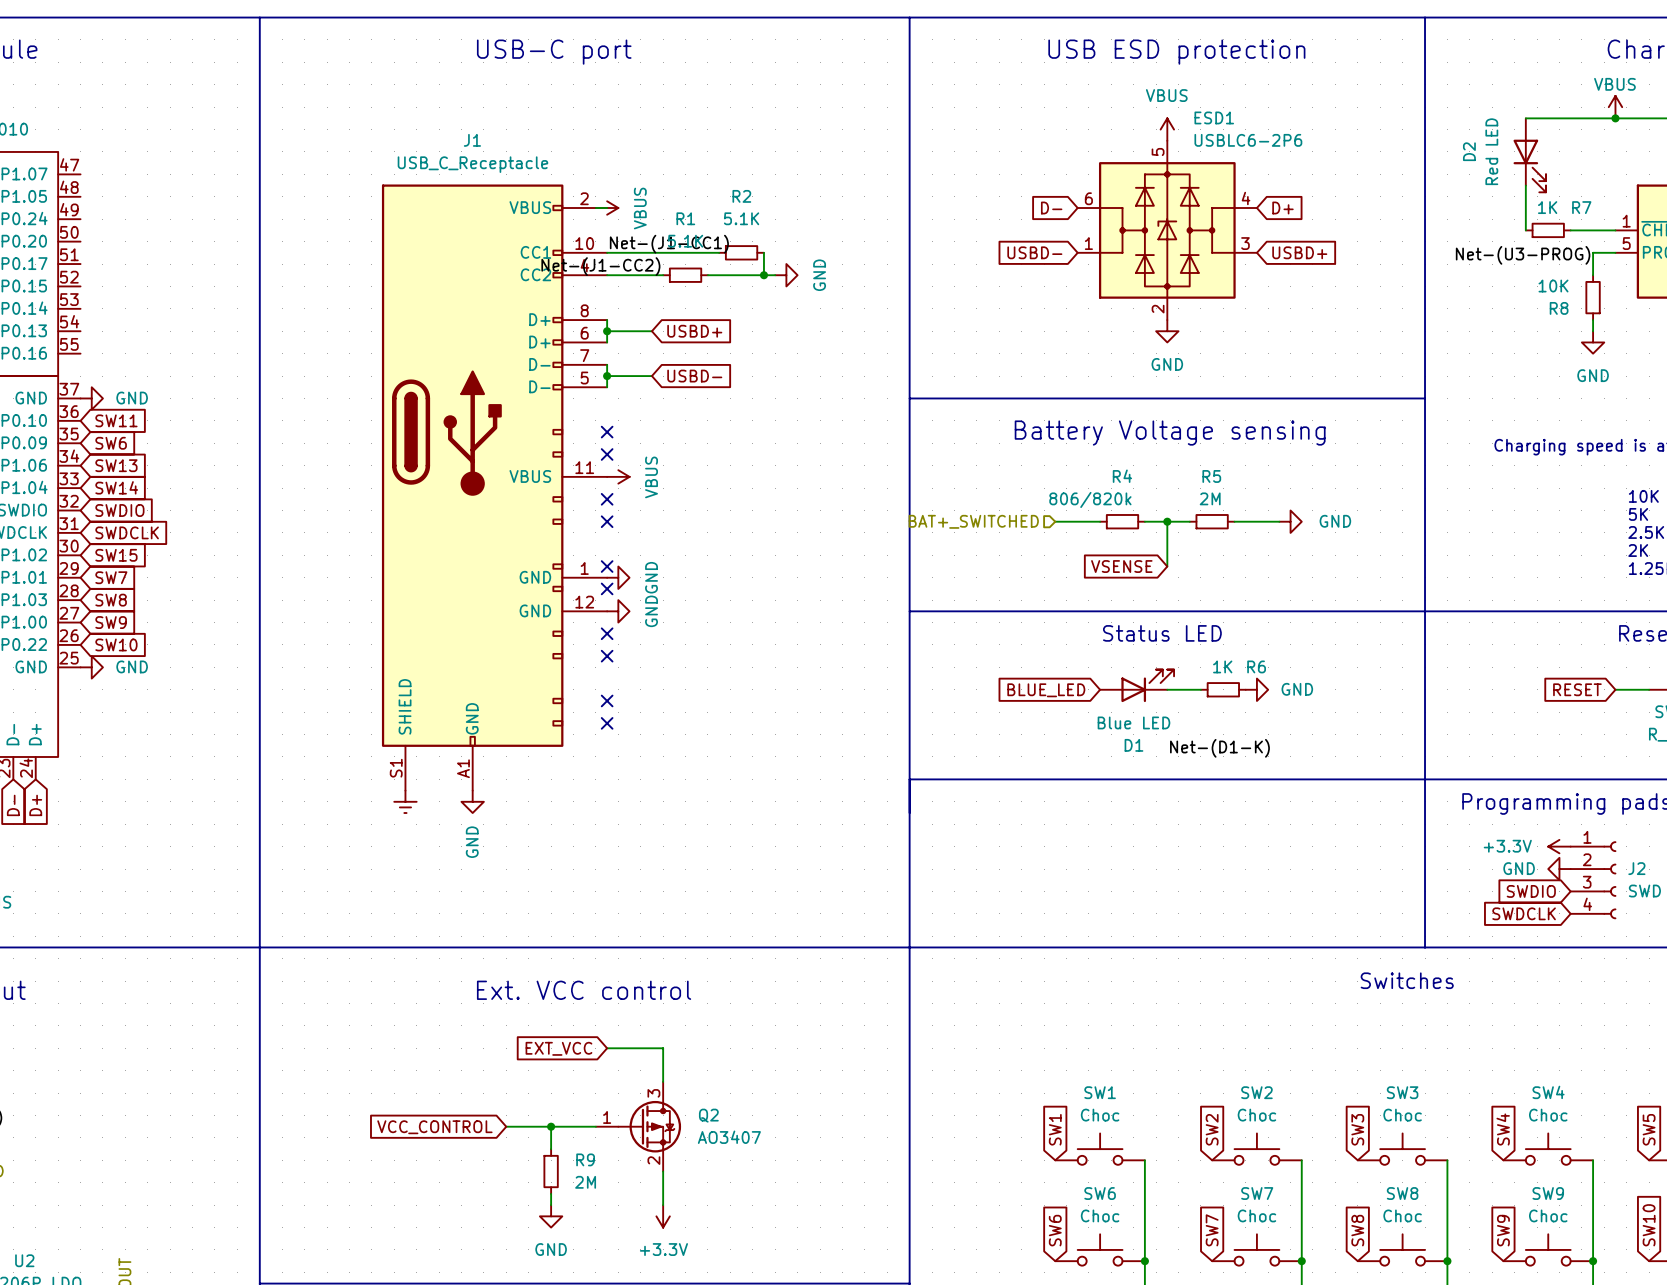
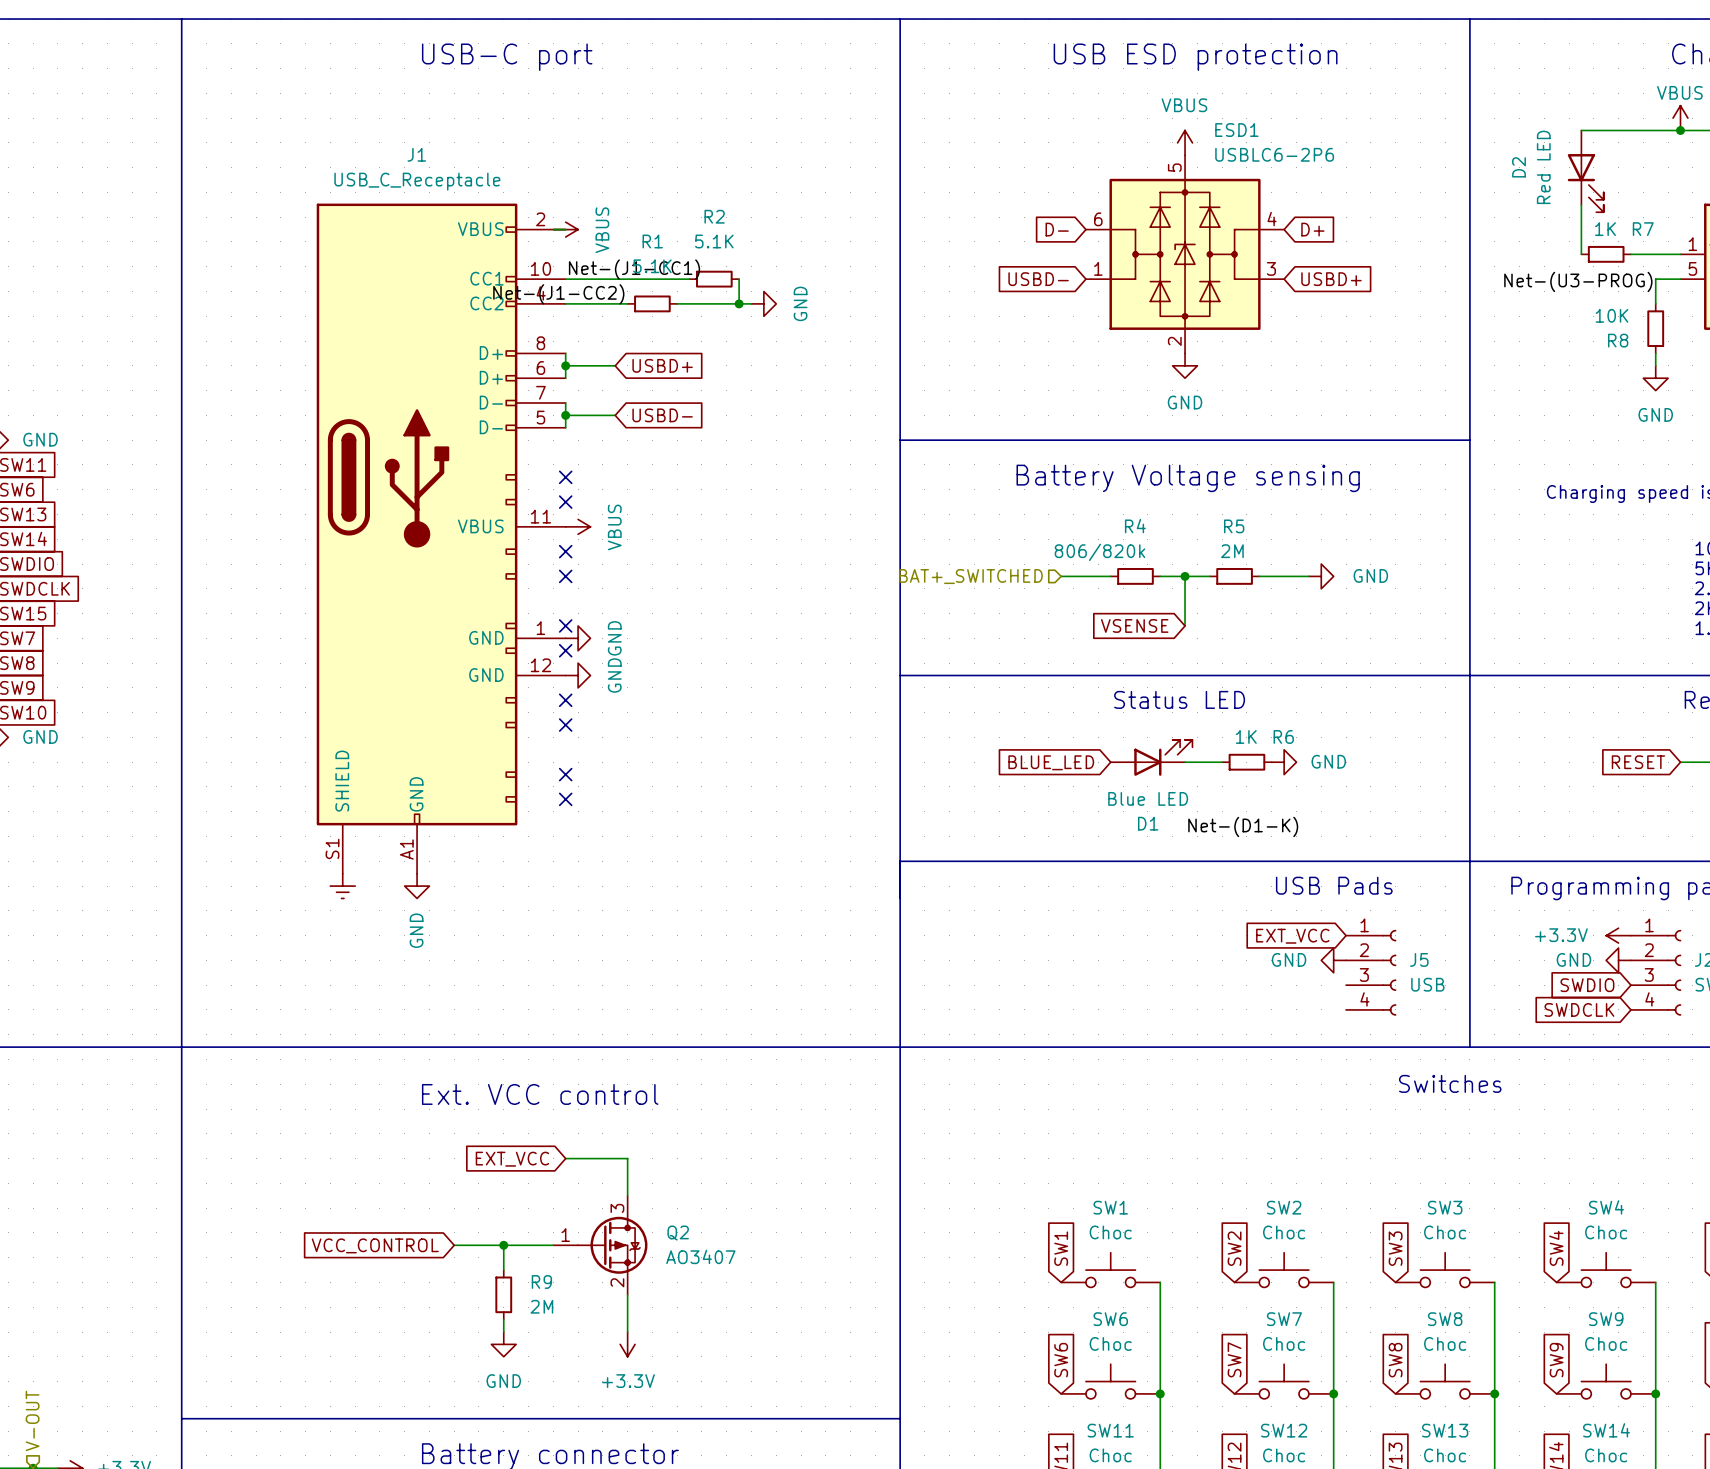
text: none -> USB Pads (1334, 885)
global label: none -> EXT_VCC (1292, 936)
power symbol: none -> GND (1333, 960)
J5: none -> USB (1371, 972)

